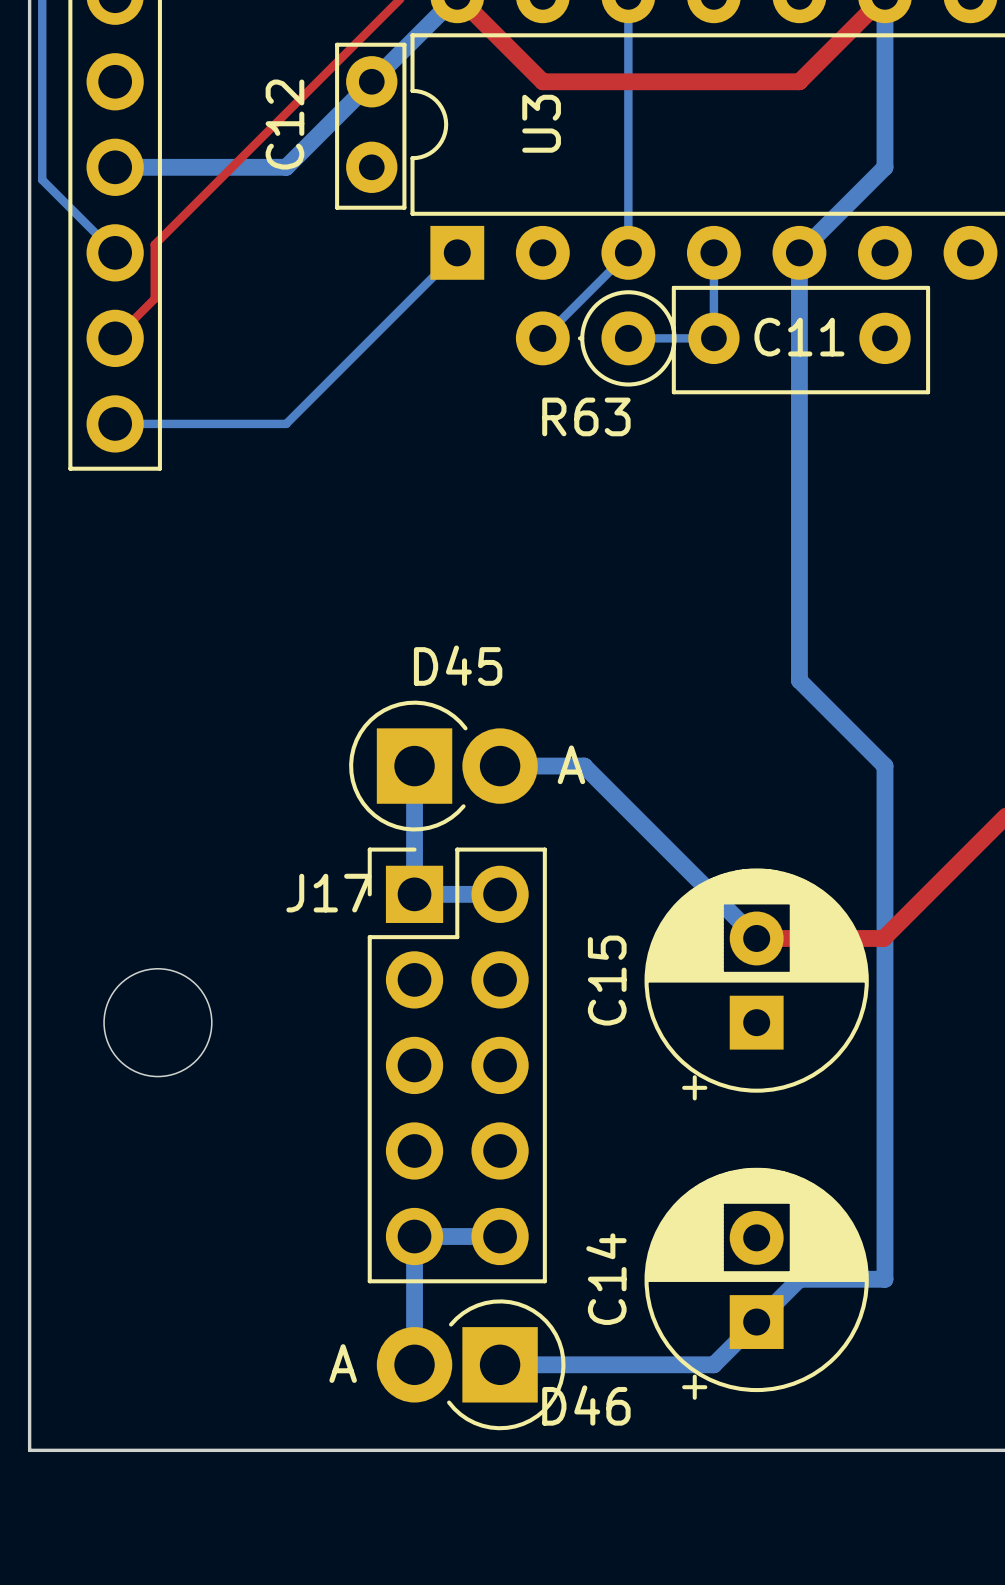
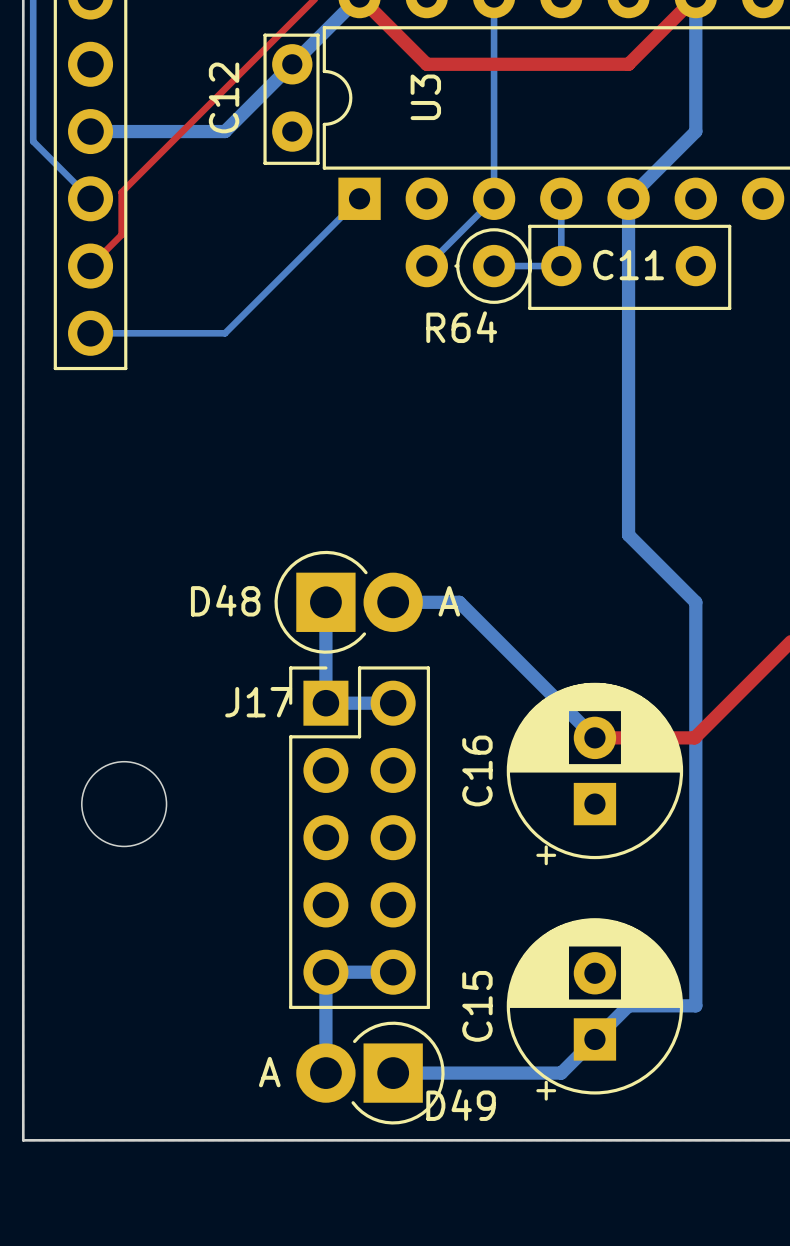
R63 name: R63 (586, 416) -> R64 (461, 327)
D45 name: D45 (458, 665) -> D48 (225, 600)
C15 name: C15 (607, 980) -> C16 (477, 770)
C14 name: C14 (606, 1279) -> C15 (477, 1006)
D46 name: D46 (586, 1405) -> D49 (461, 1105)

